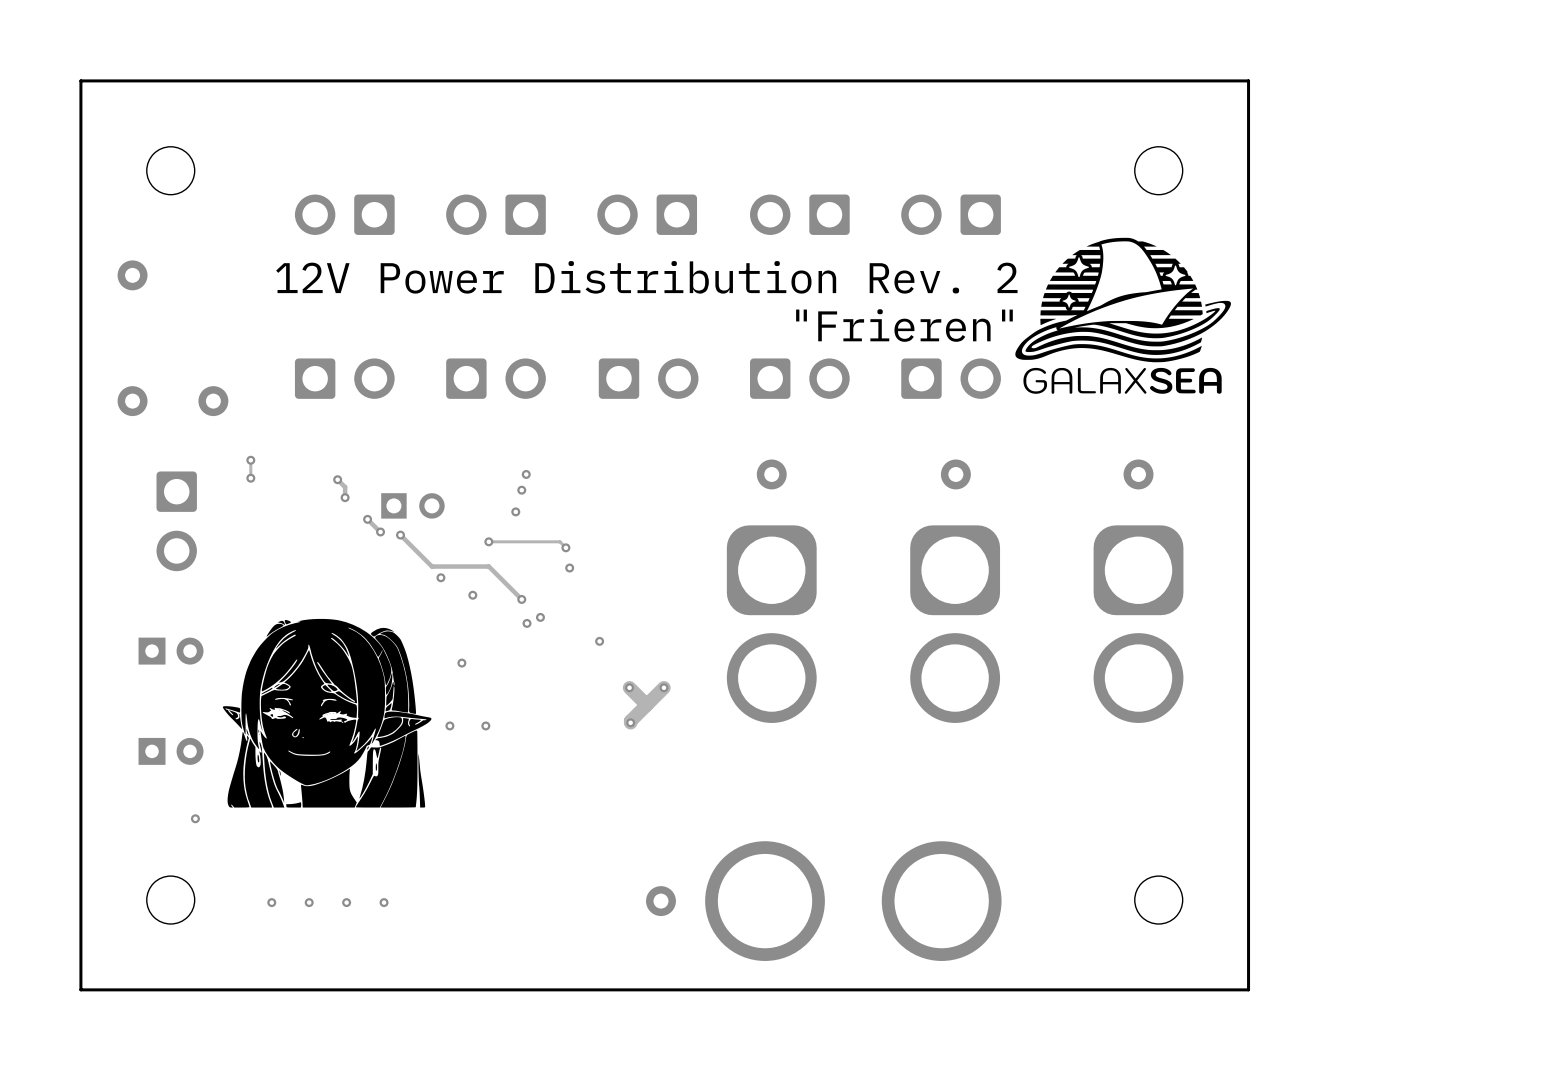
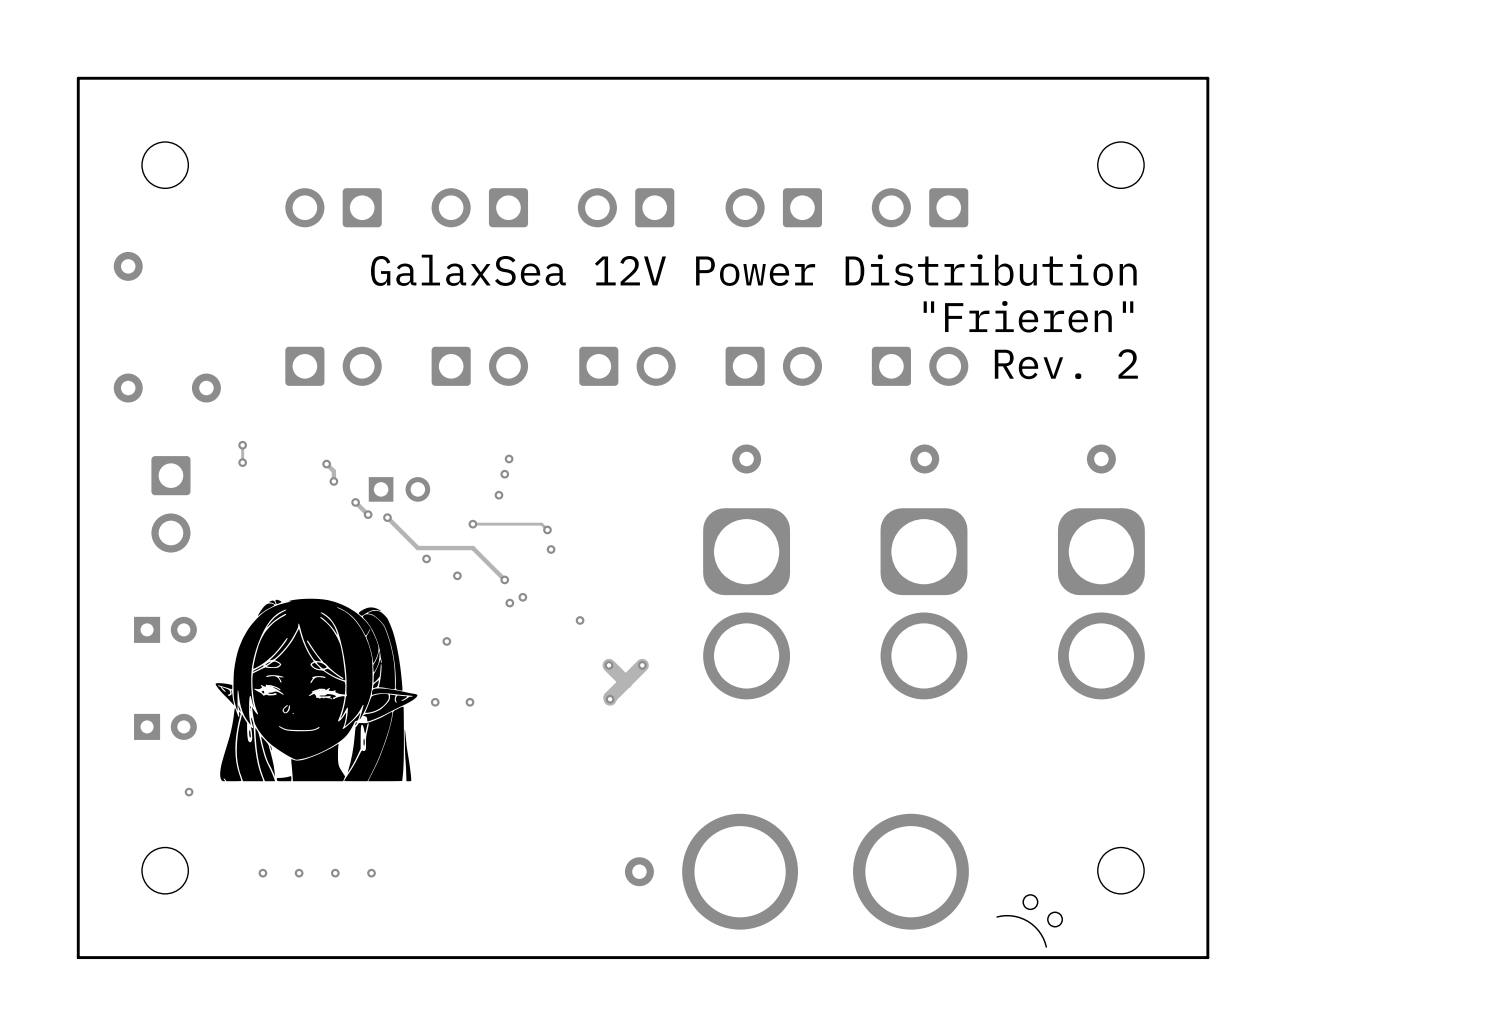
drawing: [1015, 237, 1231, 394] -> none
text: 12V Power Distribution Rev. 2 (646, 277) -> GalaxSea 12V Power Distribution (753, 270)
text position: "Frieren" (904, 325) -> "Frieren" (1028, 316)
text: none -> Rev. 2 (1066, 364)
drawing: none -> [1022, 894, 1064, 928]
line: none -> (997, 916) (1015, 916) (1028, 921) (1041, 934) (1046, 947)

